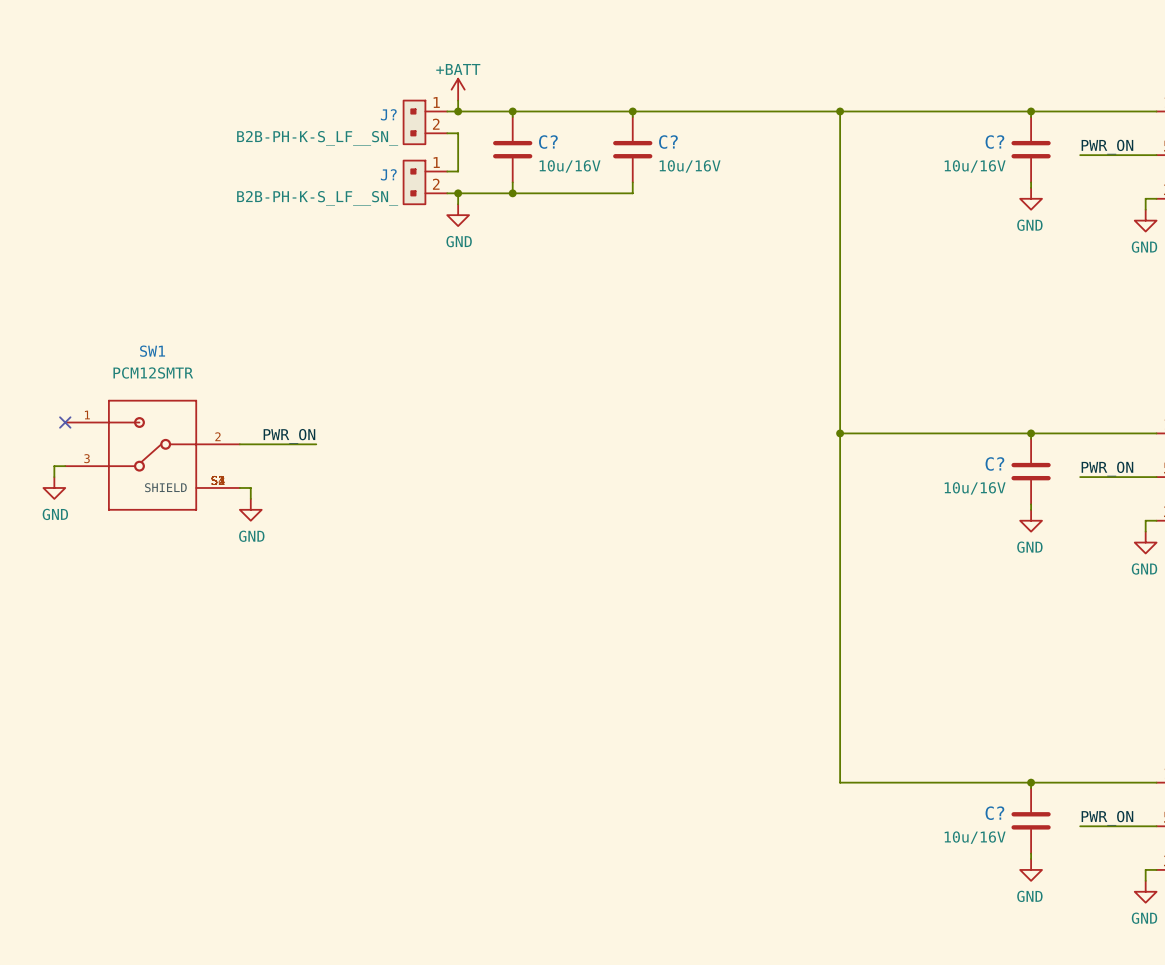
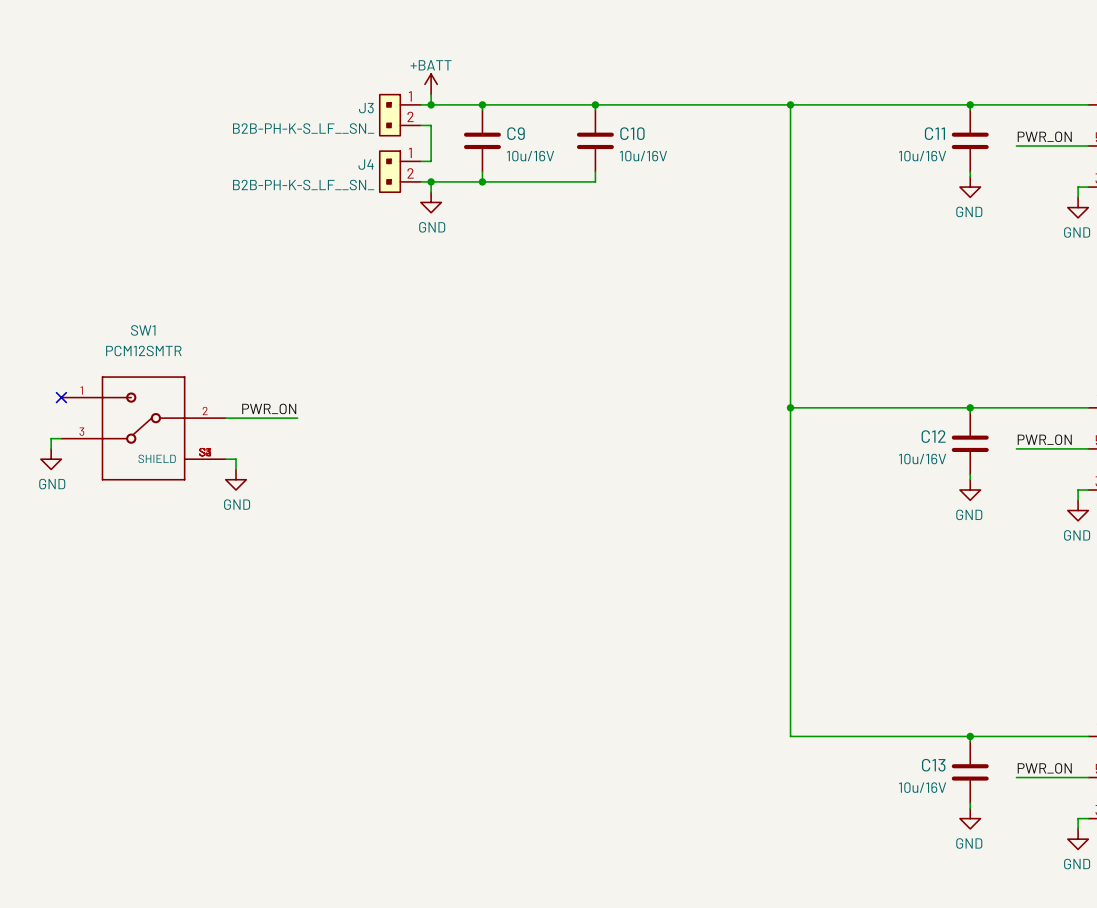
J? name: J? (388, 114) -> J3 (366, 108)
C? name: C? (548, 142) -> C9 (516, 133)
C? name: C? (668, 142) -> C10 (632, 133)
C? name: C? (994, 142) -> C11 (934, 133)
J? name: J? (388, 174) -> J4 (366, 164)
C? name: C? (994, 463) -> C12 (933, 436)
C? name: C? (994, 813) -> C13 (933, 765)

